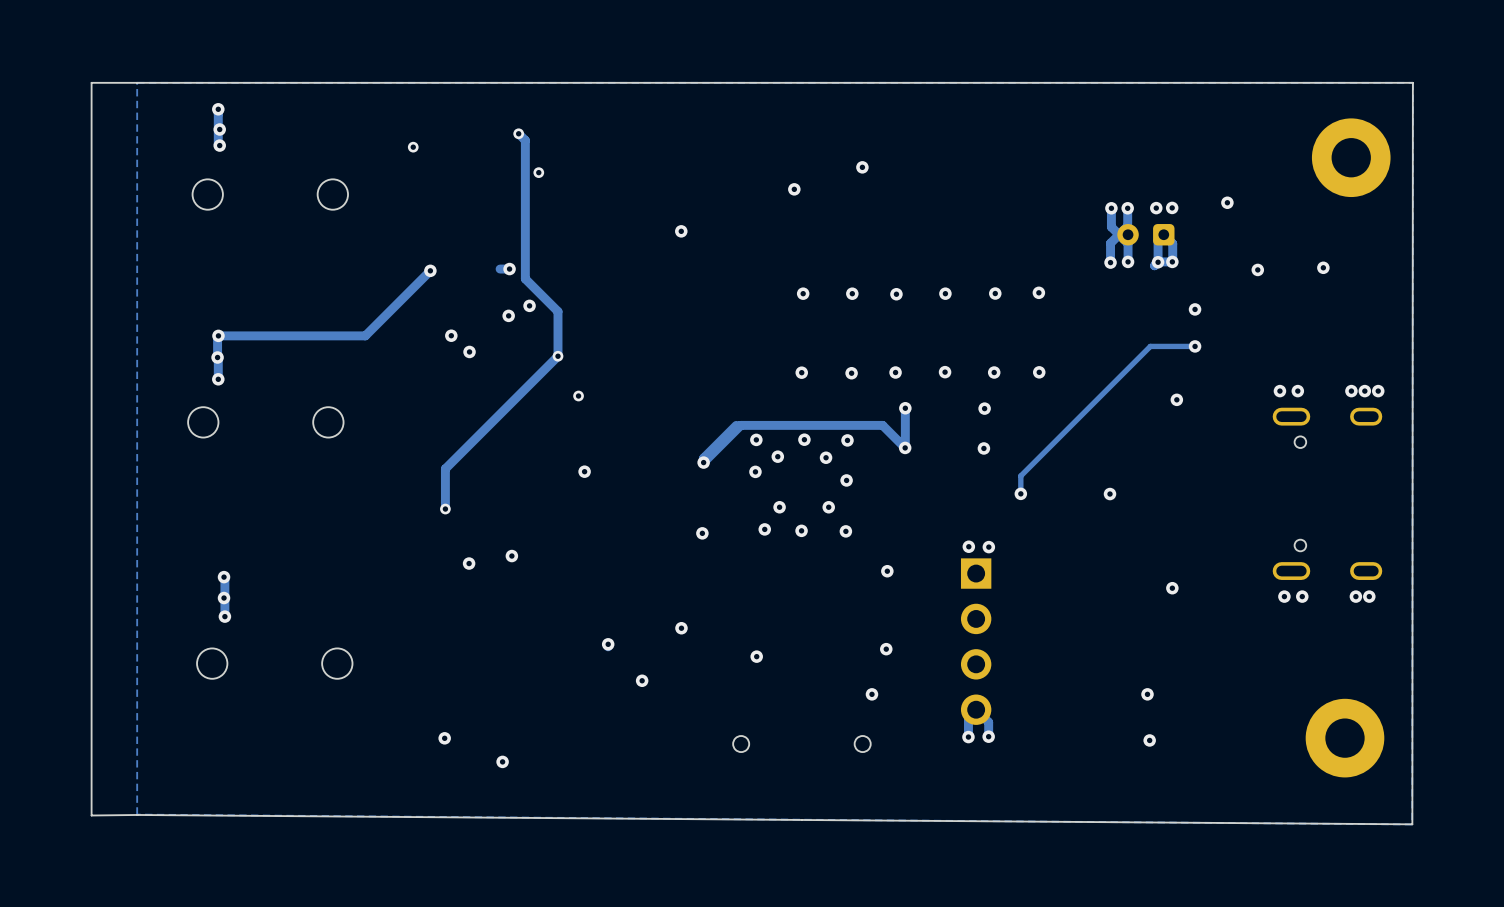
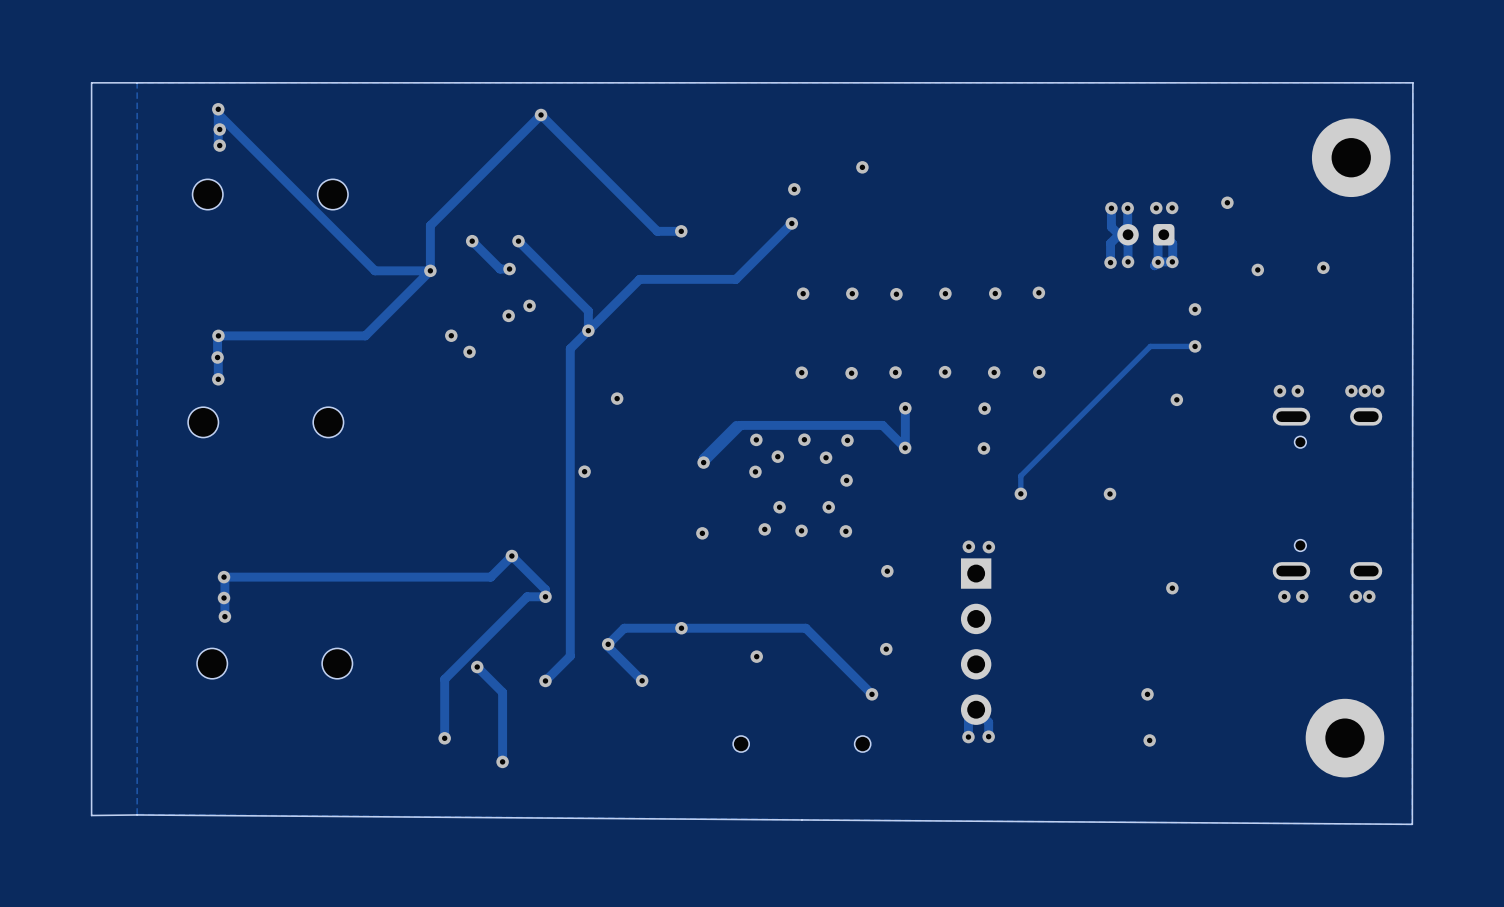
track: none -> (218, 114) (375, 270) (430, 270) (430, 225) (541, 115) (657, 231) (681, 231)
via: none -> (541, 115)
track: (518, 133) (525, 140) (525, 278) (558, 311) (558, 356) (445, 468) (445, 509) -> none
via: (518, 133) -> none
via: (413, 147) -> none
via: (538, 172) -> none
track: none -> (791, 223) (735, 279) (639, 279) (570, 348) (570, 656) (545, 680)
via: none -> (791, 223)
track: none -> (472, 241) (500, 269)
via: none -> (472, 241)
track: none -> (518, 241) (588, 311) (588, 330)
via: none -> (518, 241)
via: none -> (588, 330)
via: (558, 356) -> none
via: (578, 396) -> none
via: none -> (617, 398)
via: (445, 509) -> none
via: (469, 563) -> none
track: none -> (224, 577) (490, 577) (511, 556) (545, 589) (545, 596) (527, 596) (444, 679) (444, 738)
via: none -> (545, 596)
track: none -> (608, 644) (624, 628) (805, 628) (871, 694)
track: none -> (608, 646) (642, 680)
track: none -> (477, 667) (502, 692) (502, 761)
via: none -> (477, 667)
via: none -> (545, 680)

